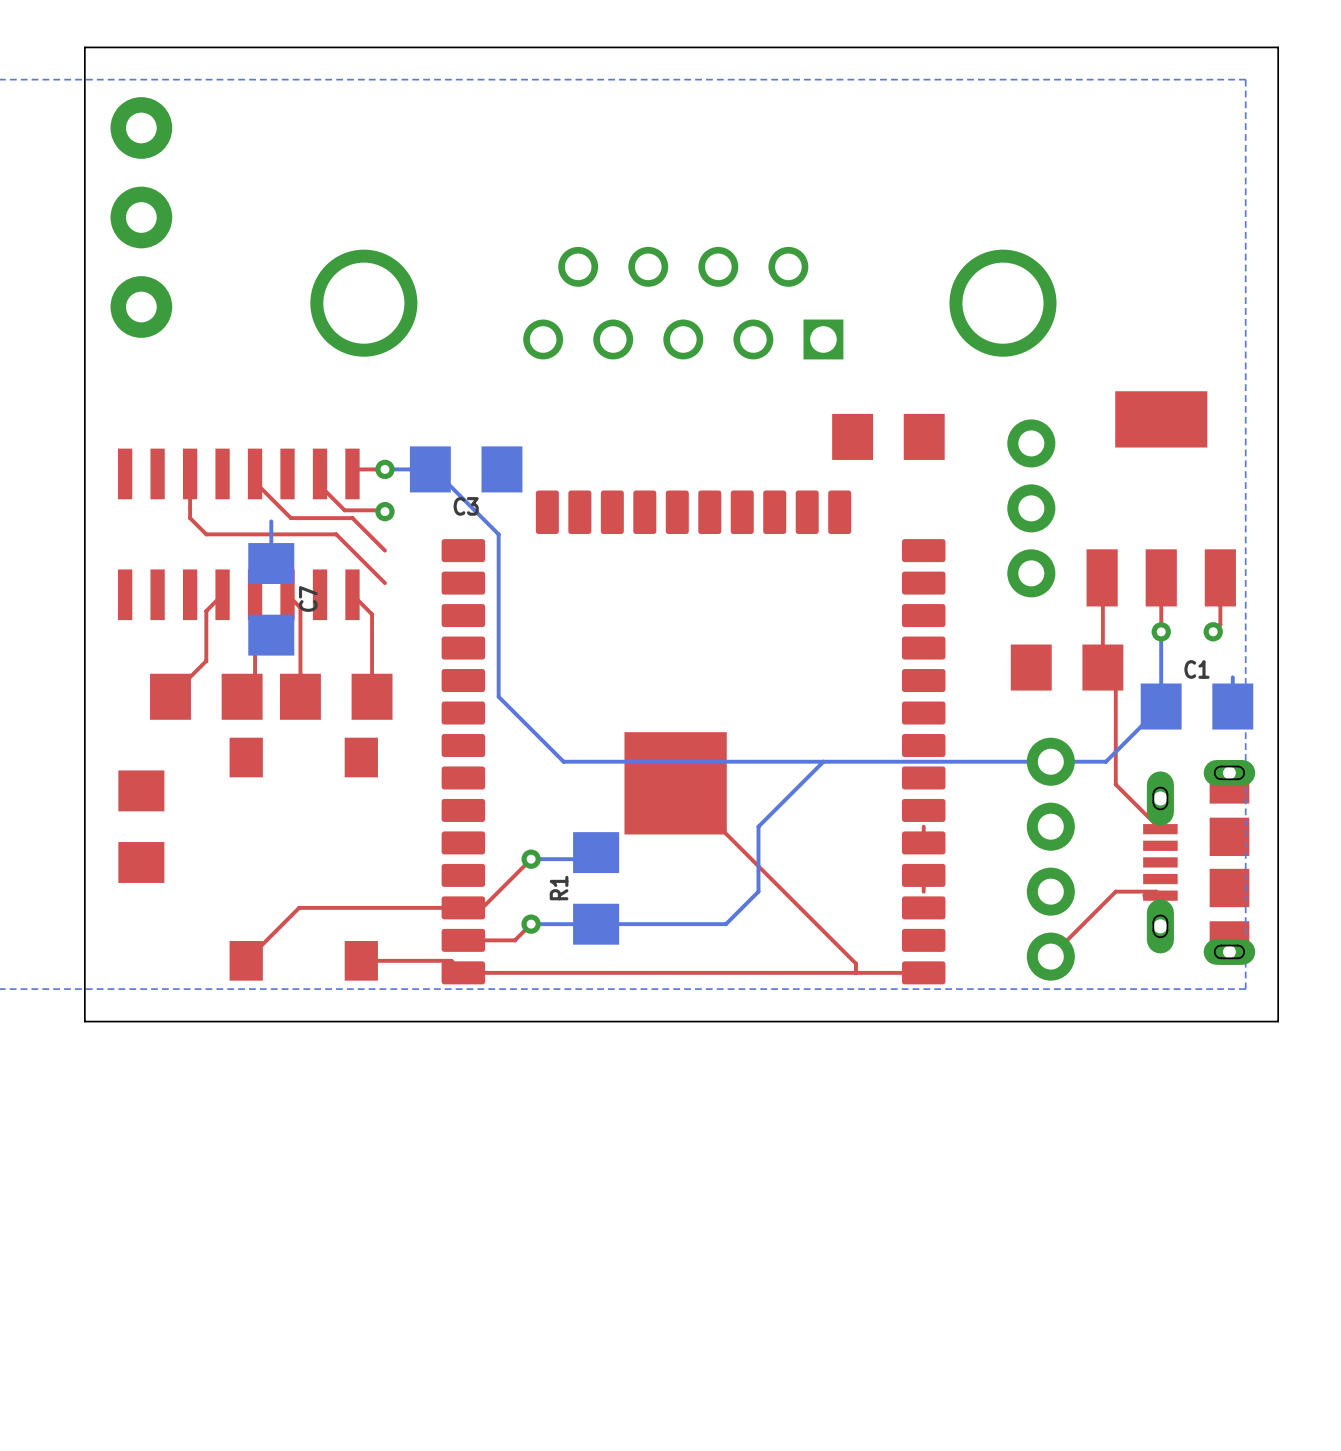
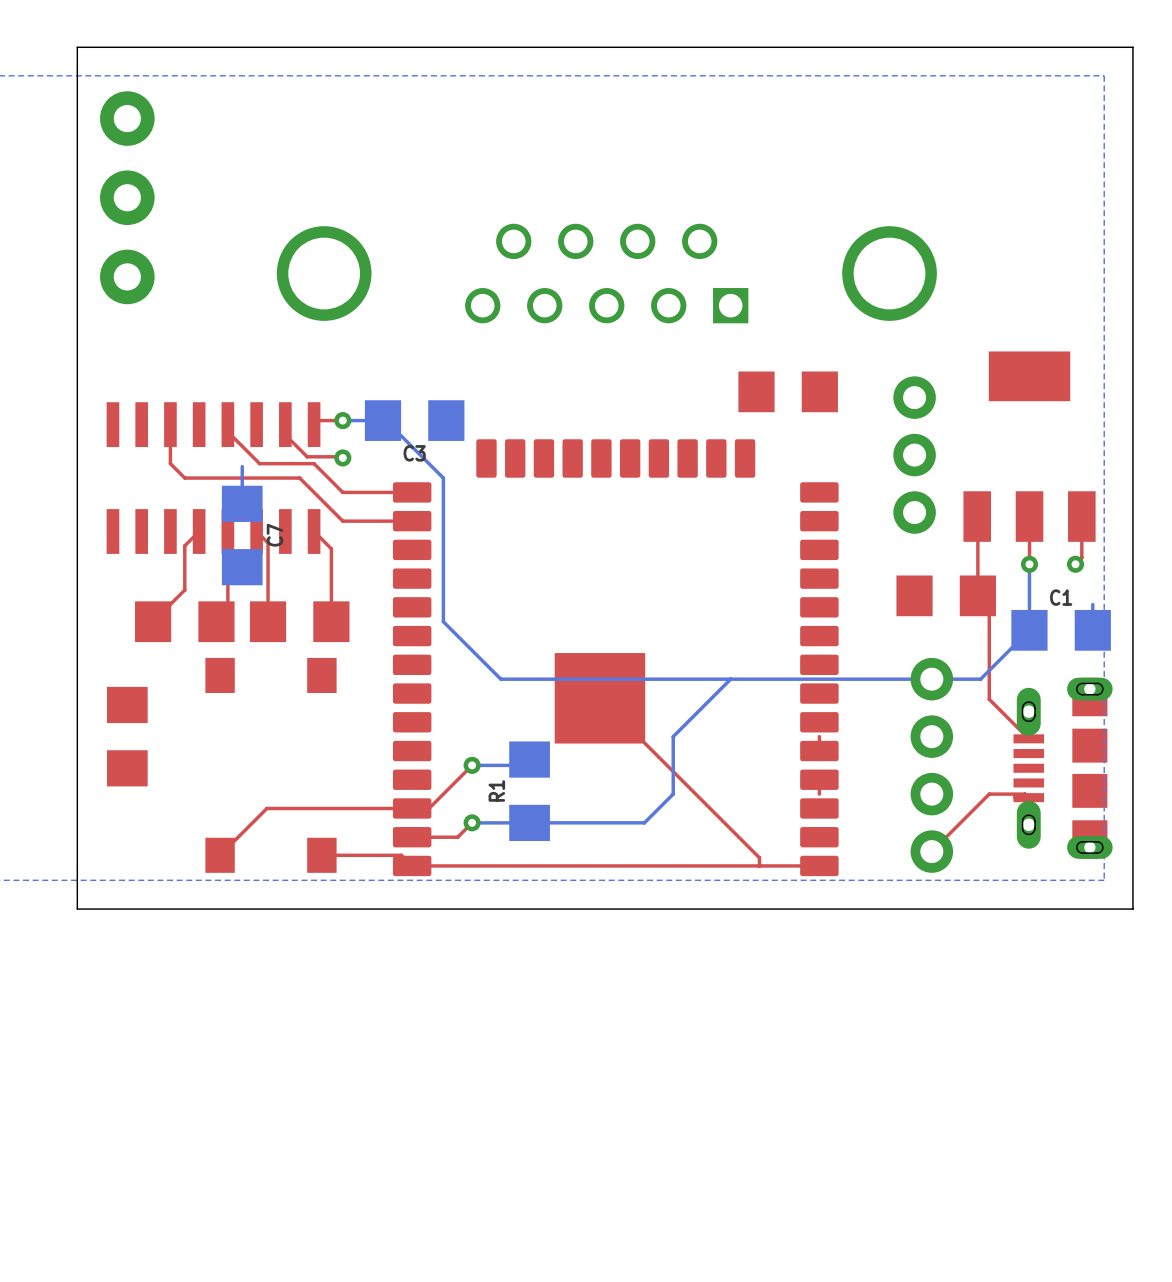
top track: none -> (412, 492) (342, 492)
top track: none -> (412, 521) (342, 521)

